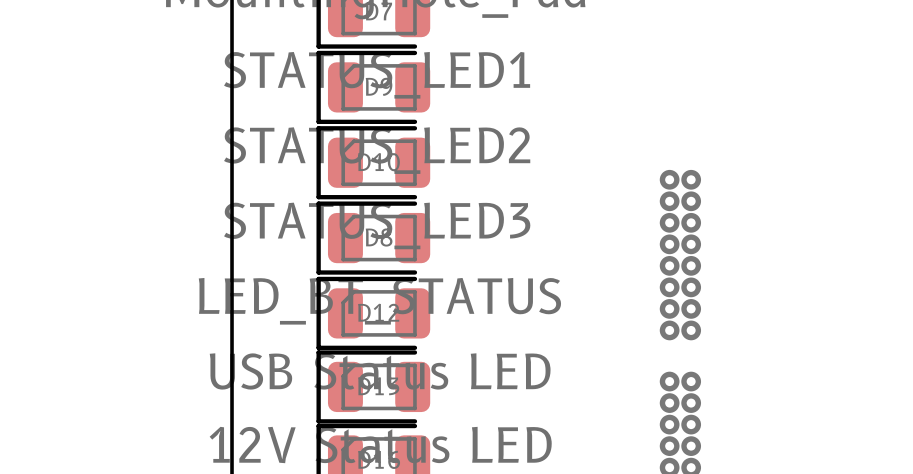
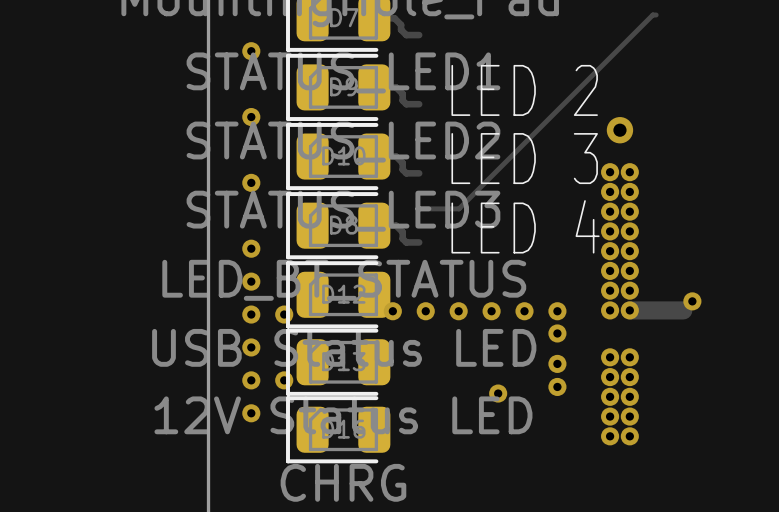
track: none -> (656, 15) (652, 15) (459, 208) (419, 208)
track: none -> (374, 18) (394, 18) (401, 24) (401, 29) (406, 35) (419, 35)
via: none -> (251, 51)
track: none -> (374, 87) (396, 87) (402, 94) (402, 100) (406, 104) (419, 104)
text: none -> LED 2 (524, 90)
via: none -> (251, 117)
via: none -> (619, 130)
track: none -> (374, 156) (396, 156) (402, 163) (402, 169) (406, 173) (419, 173)
text: none -> LED 3 (524, 158)
via: none -> (251, 182)
track: none -> (374, 225) (396, 225) (402, 232) (402, 238) (406, 242) (419, 242)
text: none -> LED 4 (525, 226)
via: none -> (251, 248)
via: none -> (251, 281)
via: none -> (692, 301)
track: none -> (629, 310) (683, 310)
via: none -> (392, 311)
via: none -> (425, 311)
via: none -> (458, 311)
via: none -> (491, 311)
via: none -> (524, 311)
via: none -> (557, 311)
via: none -> (251, 314)
via: none -> (284, 314)
via: none -> (557, 333)
via: none -> (251, 347)
via: none -> (557, 363)
via: none -> (251, 380)
via: none -> (284, 380)
via: none -> (557, 386)
via: none -> (498, 393)
via: none -> (251, 413)

